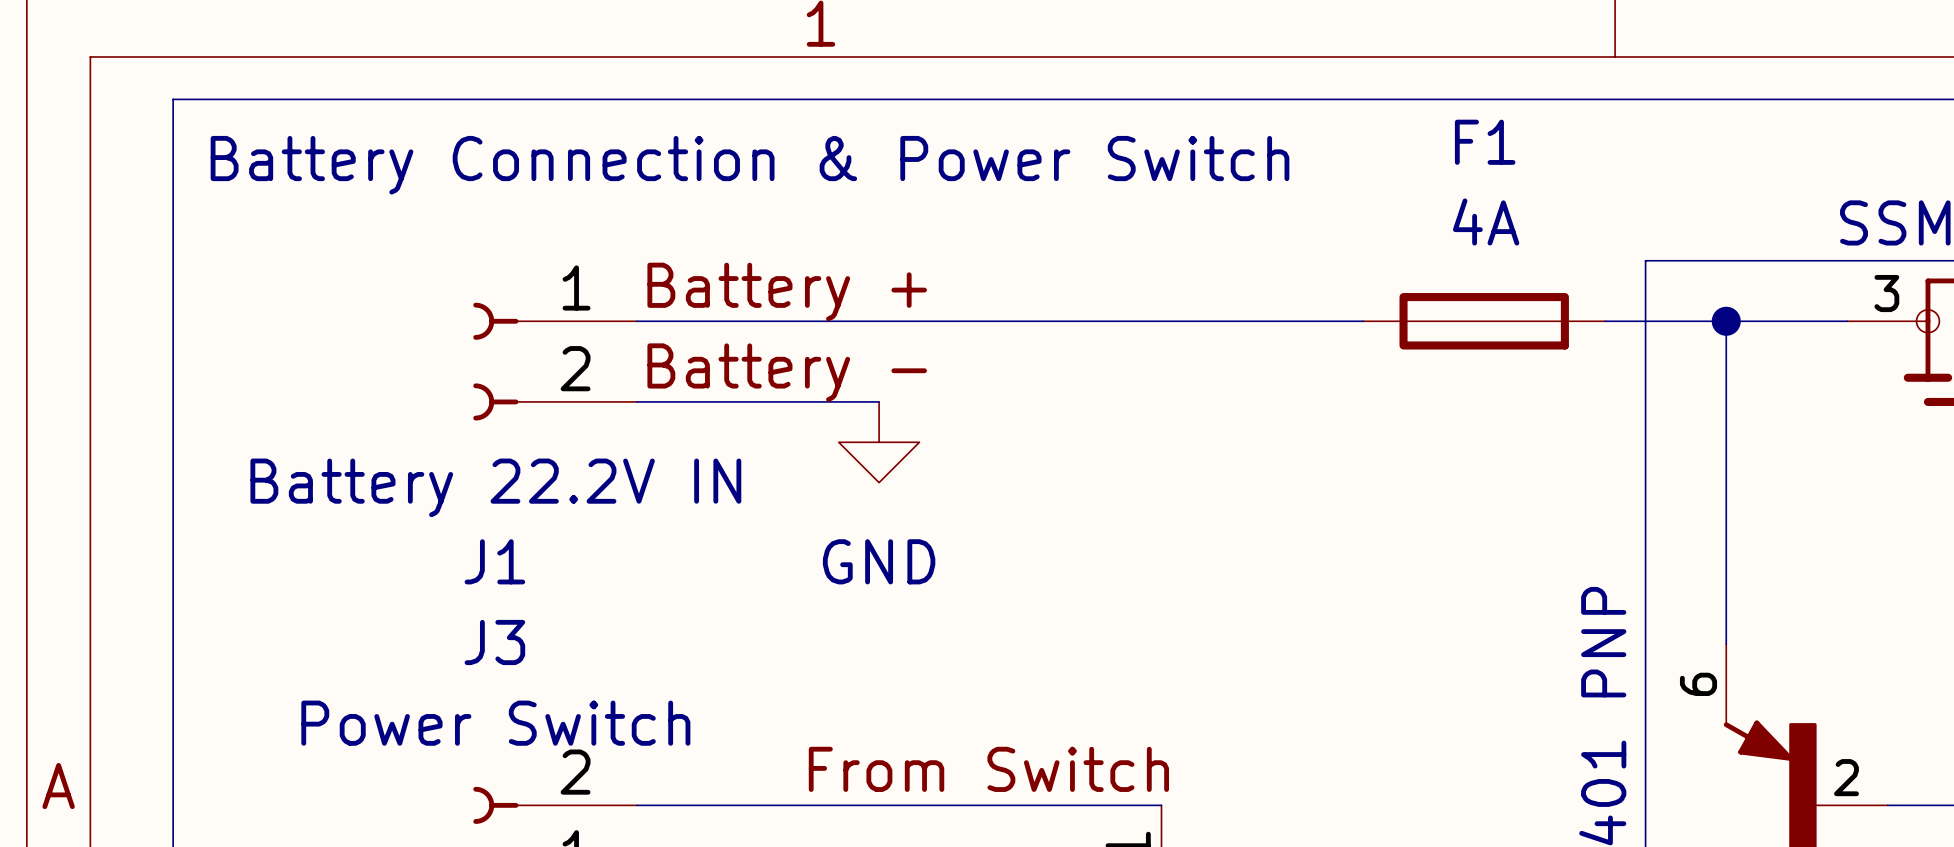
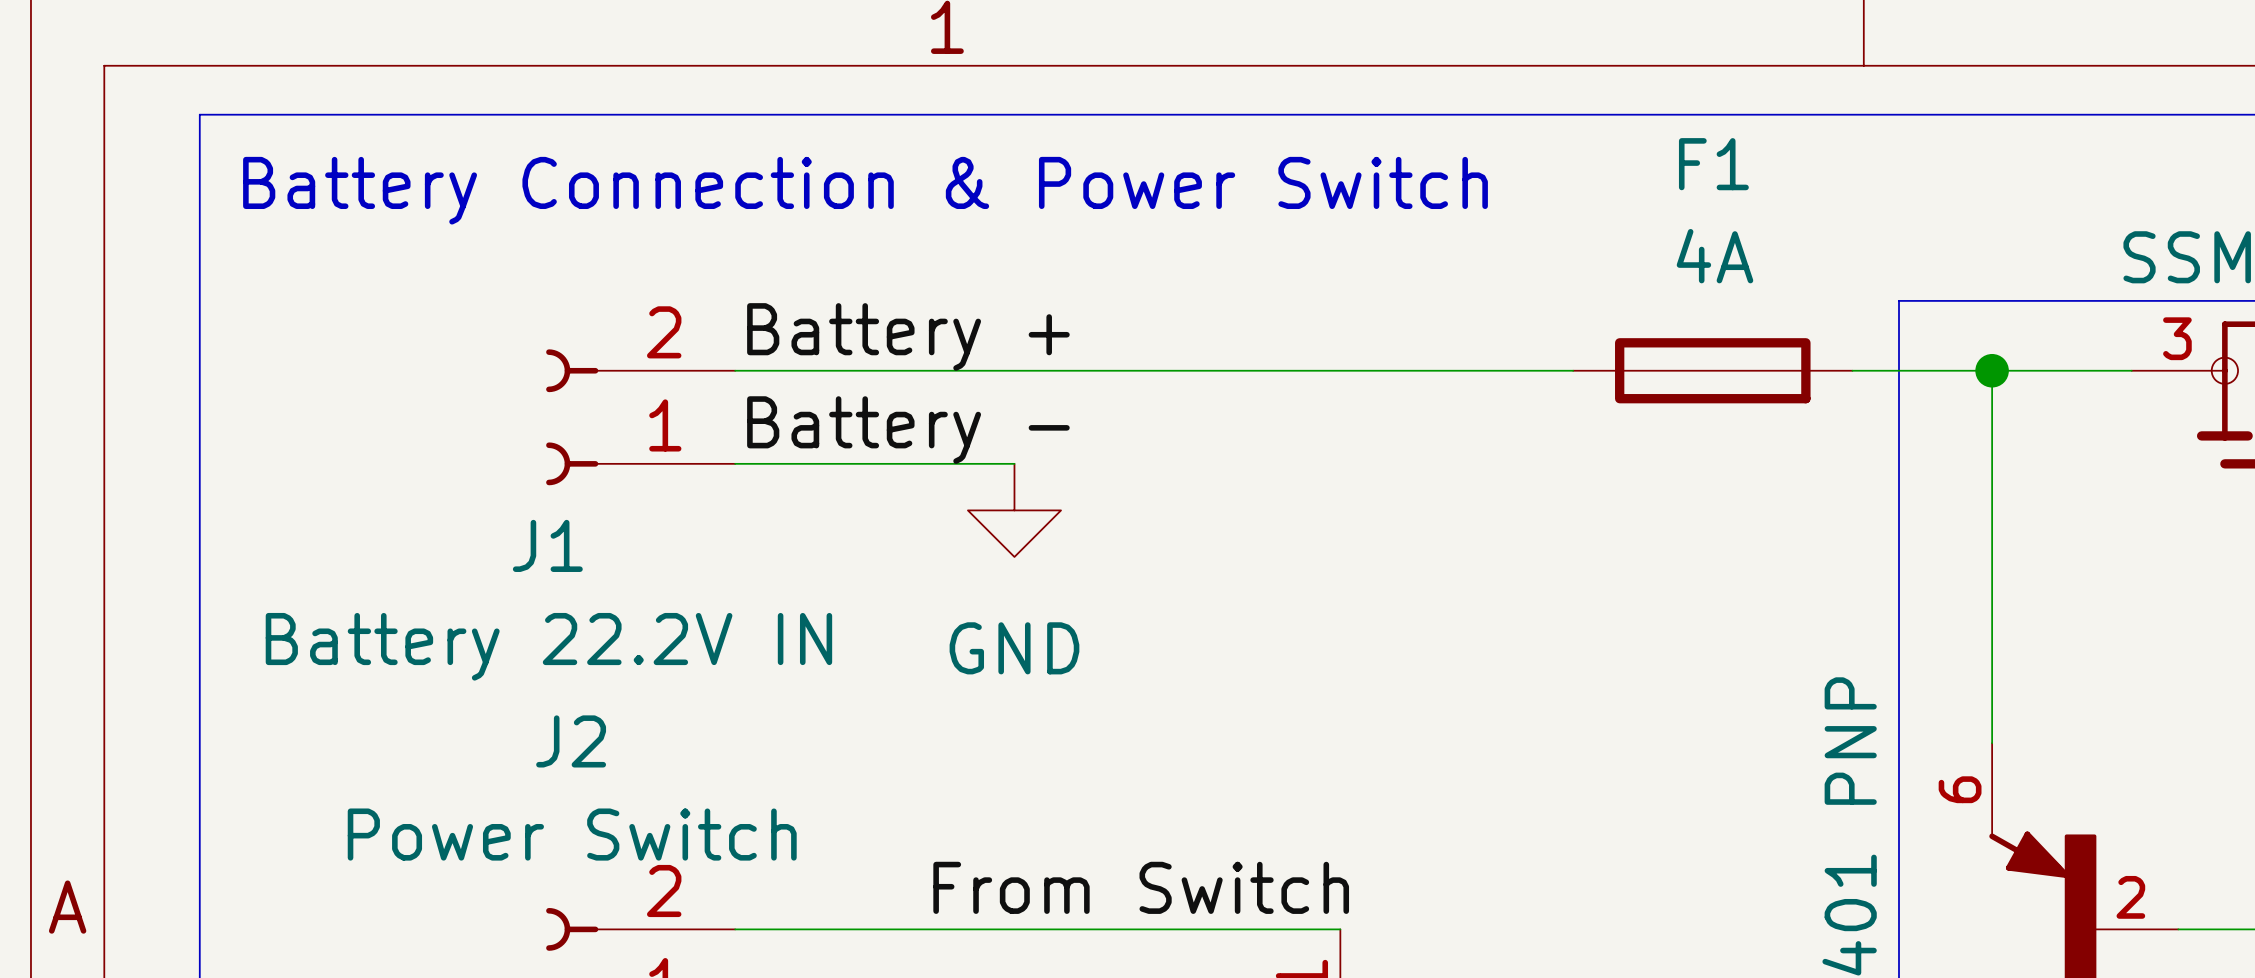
J1 flip: as is (495, 361) -> up-down (572, 417)
J1 value position: Battery 22.2V IN (495, 487) -> Battery 22.2V IN (548, 646)
J1 name position: J1 (494, 561) -> J1 (547, 545)
J3 name: J3 (494, 642) -> J2 (571, 741)

